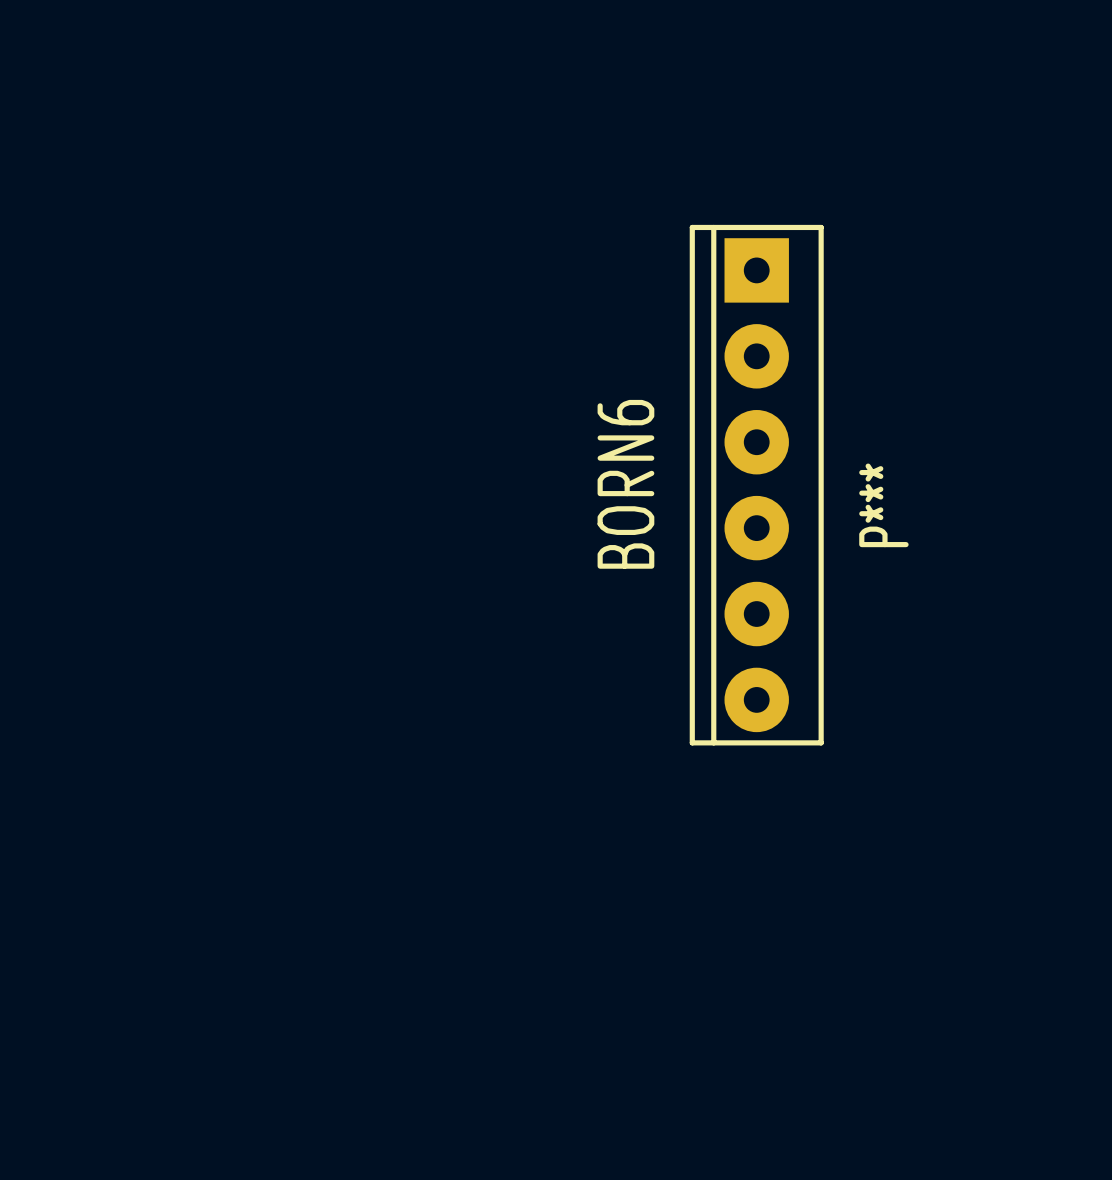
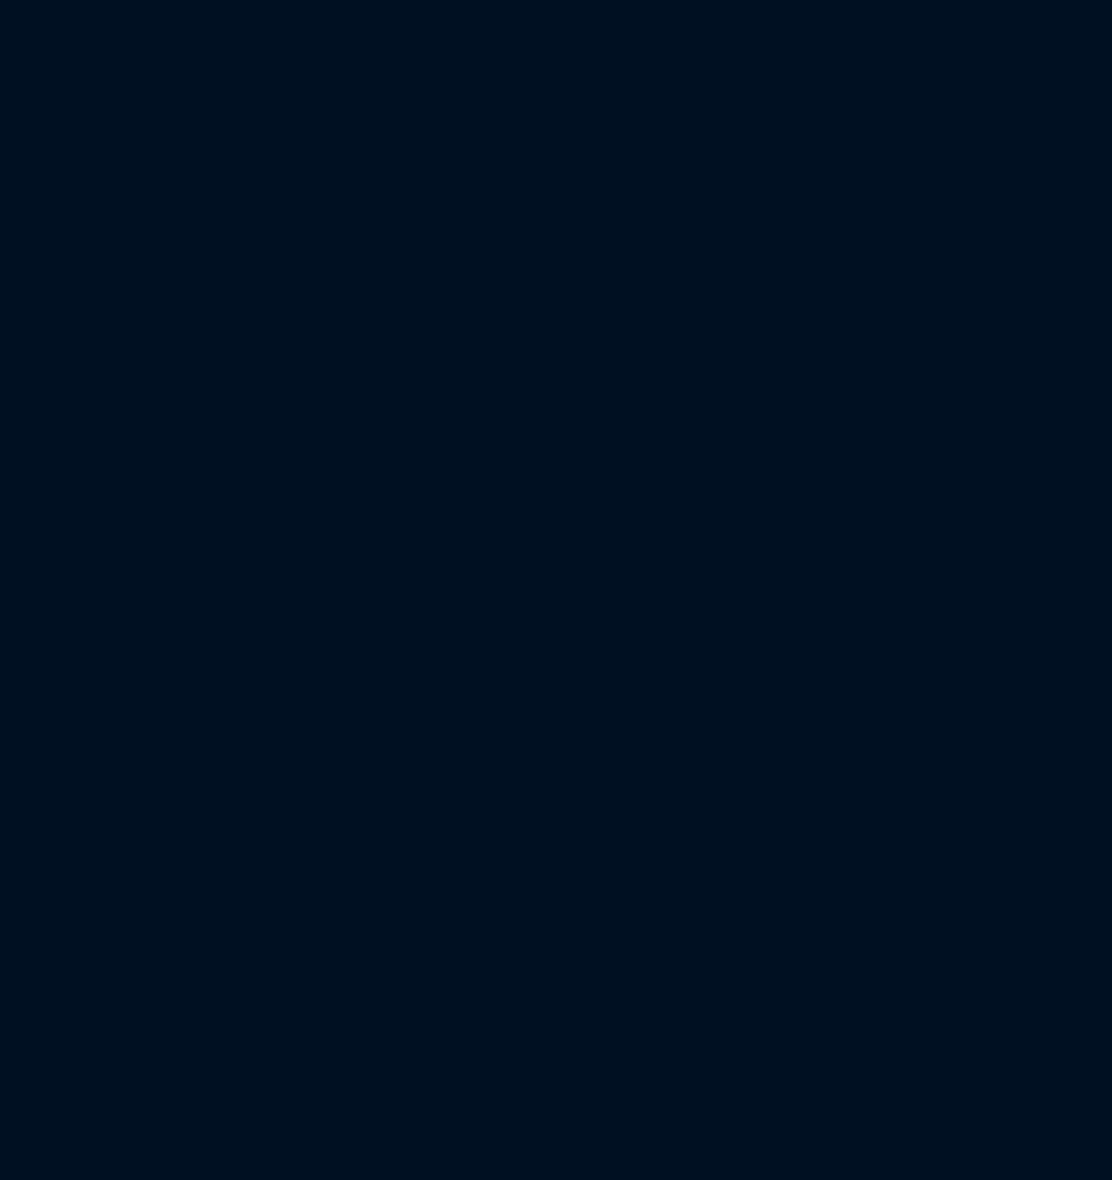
P***: BORN6 (756, 485) -> none

